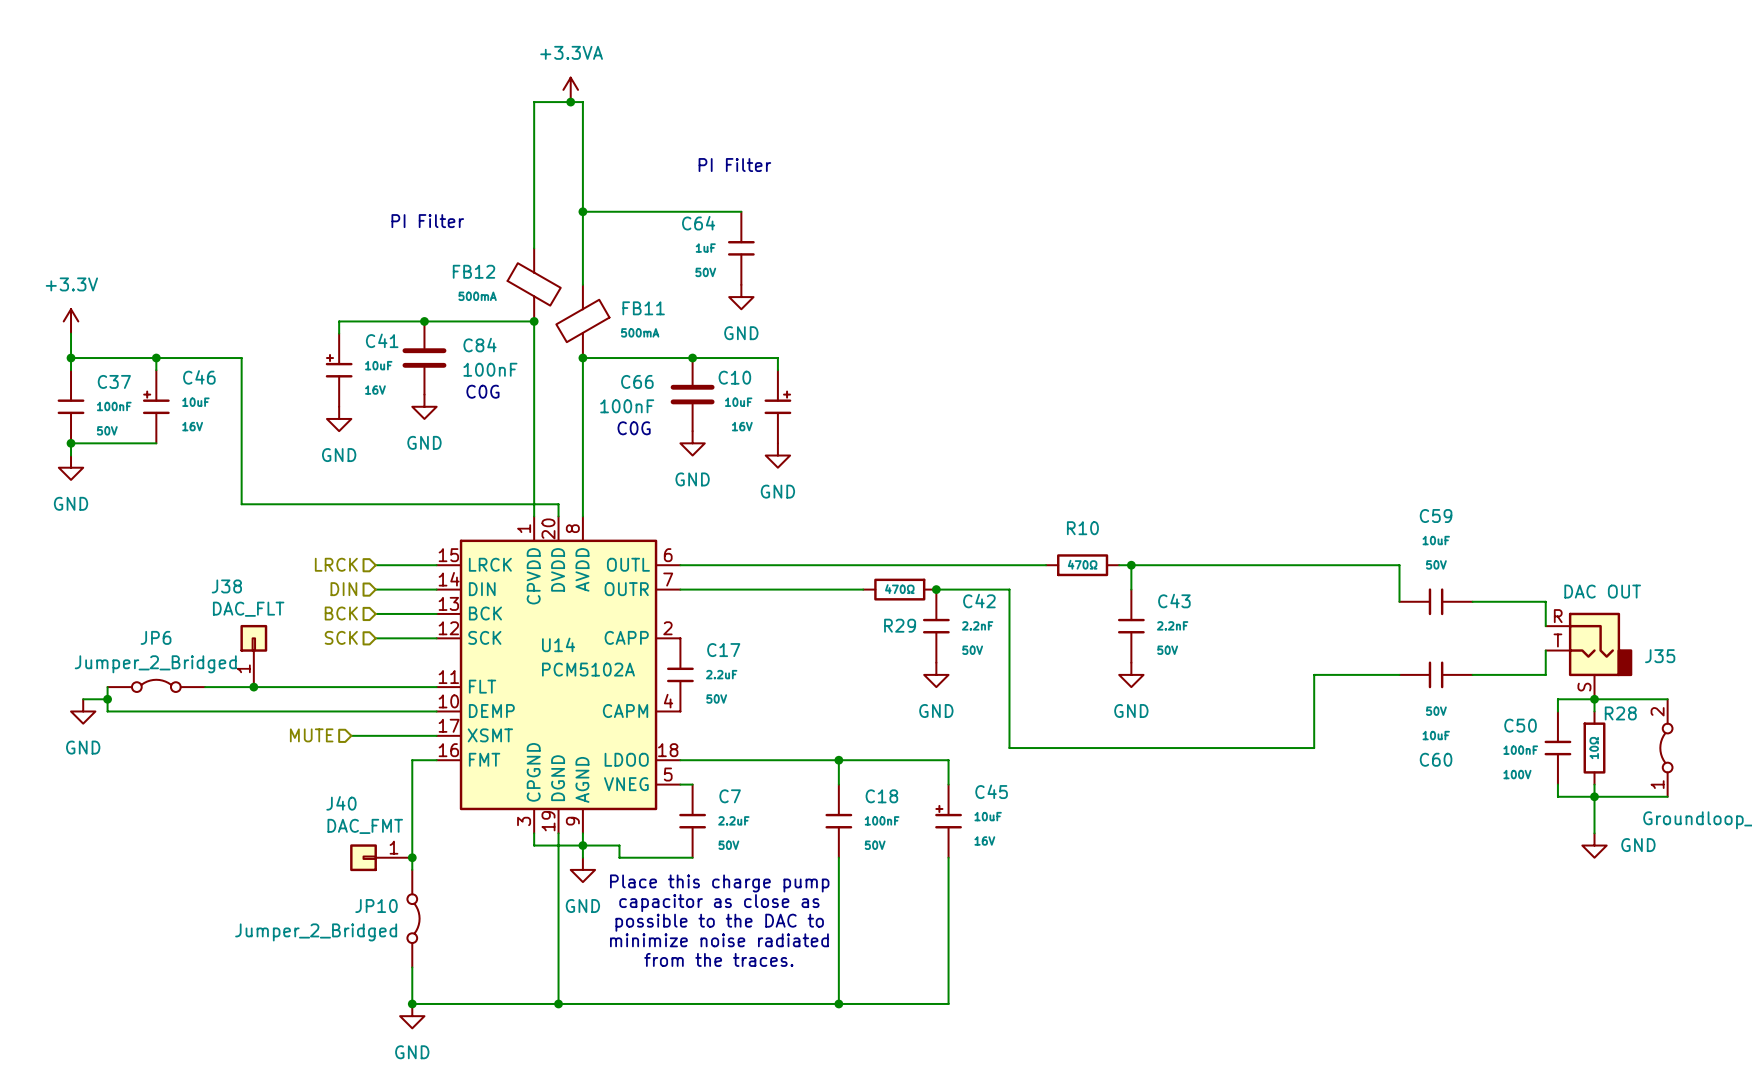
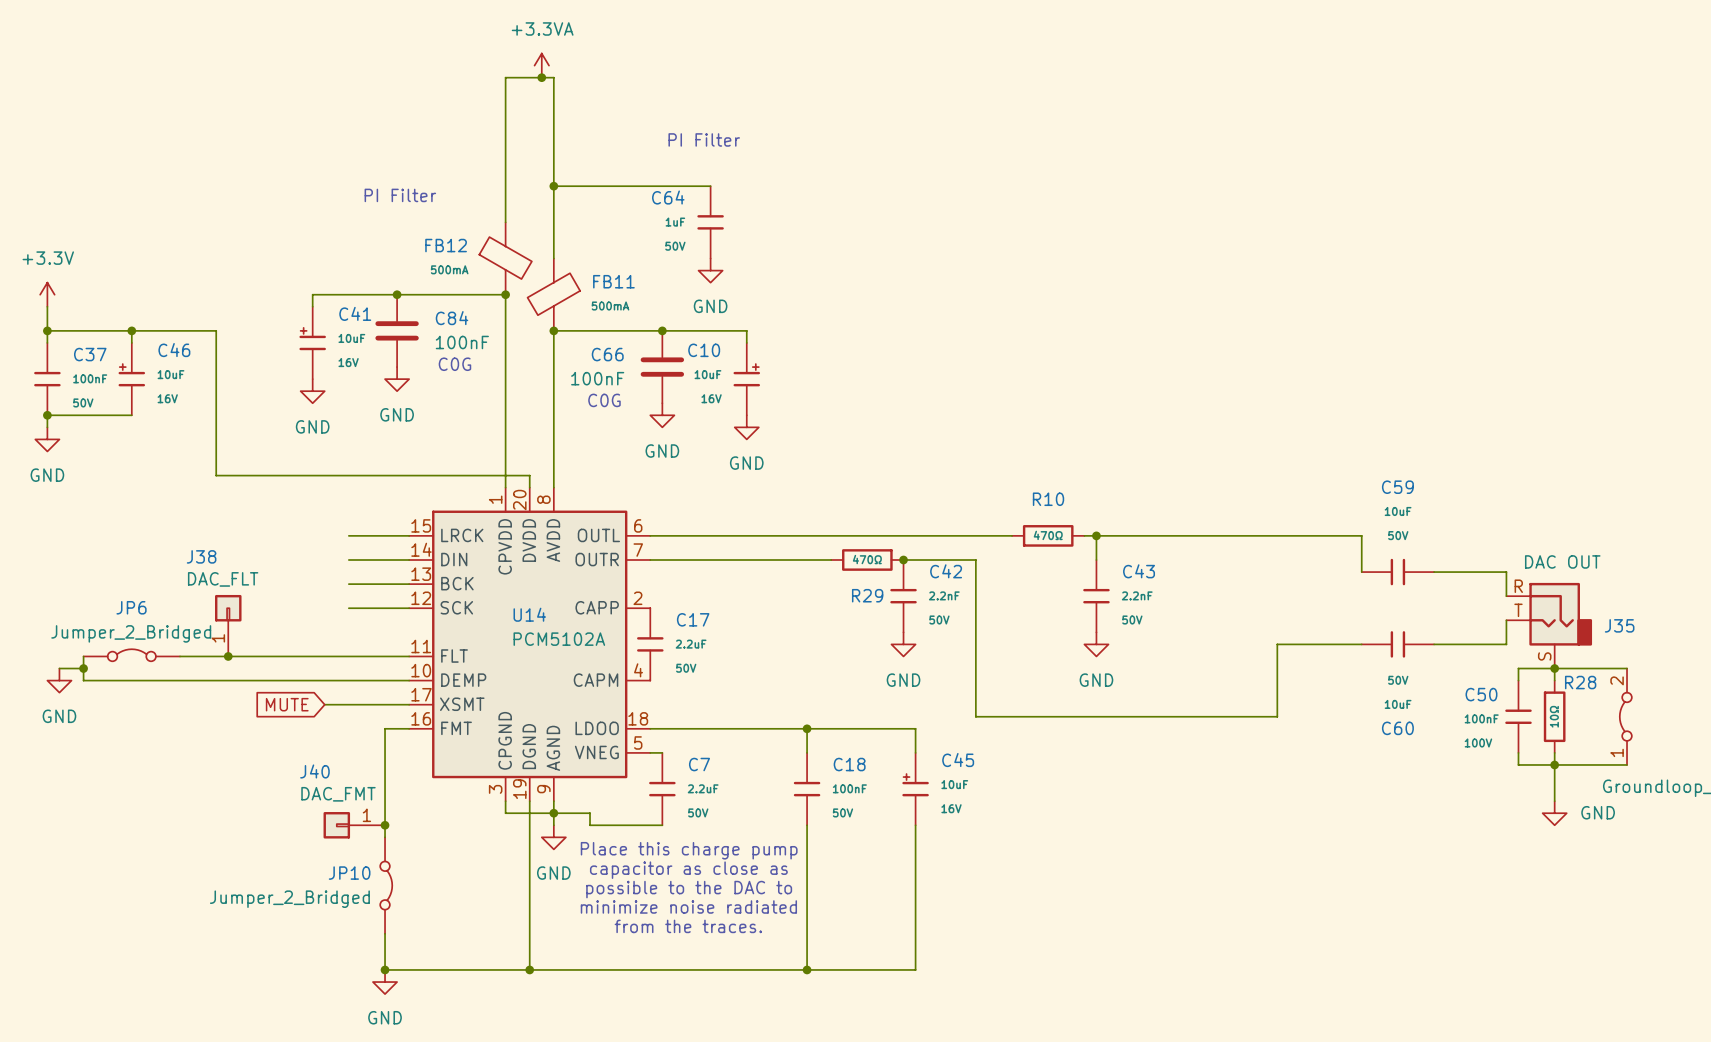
hierarchical label: LRCK (336, 564) -> none
hierarchical label: DIN (343, 589) -> none
hierarchical label: BCK (341, 613) -> none
hierarchical label: SCK (341, 637) -> none
hierarchical label: MUTE (311, 735) -> none
global label: none -> MUTE (287, 704)

